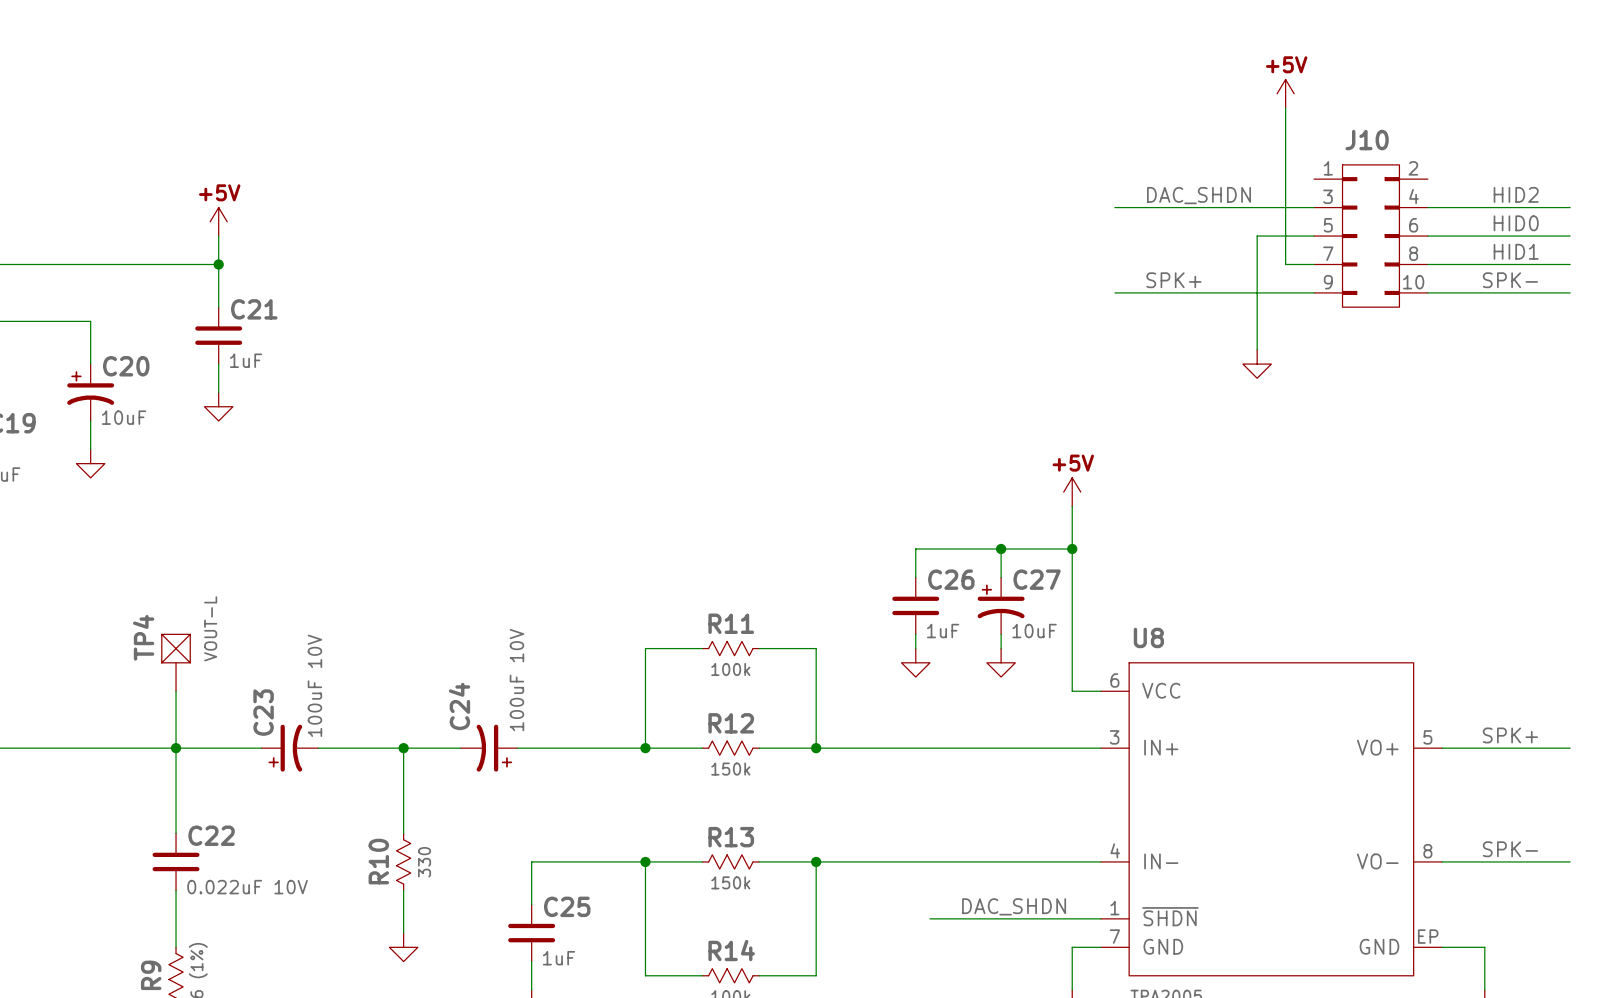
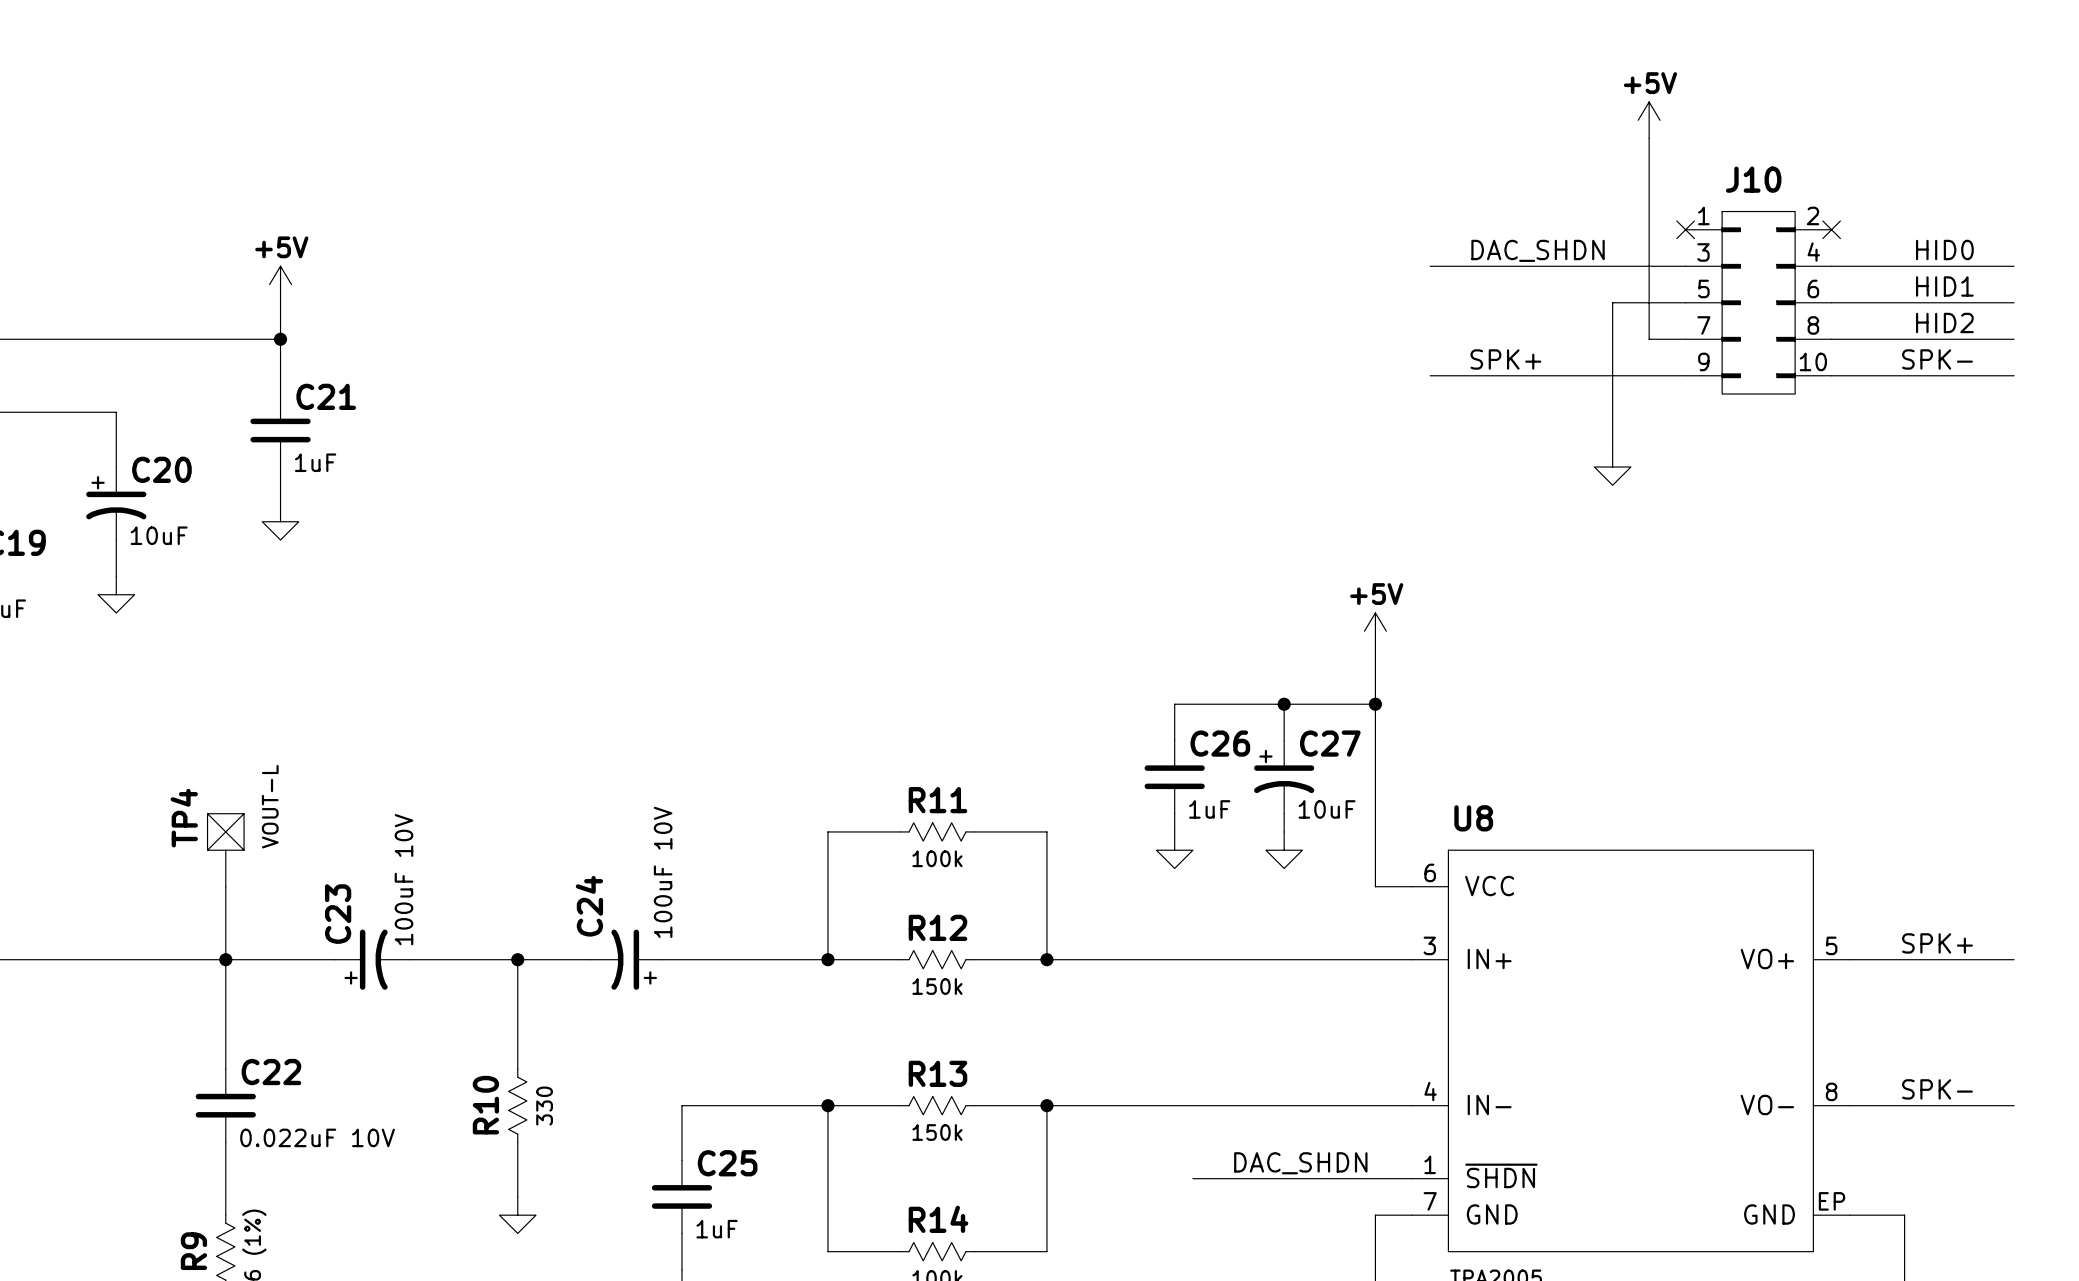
no-connect mark: none -> (1685, 229)
no-connect mark: none -> (1831, 229)
label: HID2 (1516, 194) -> HID0 (1944, 249)
label: HID0 (1516, 223) -> HID1 (1944, 286)
label: HID1 (1516, 251) -> HID2 (1944, 322)

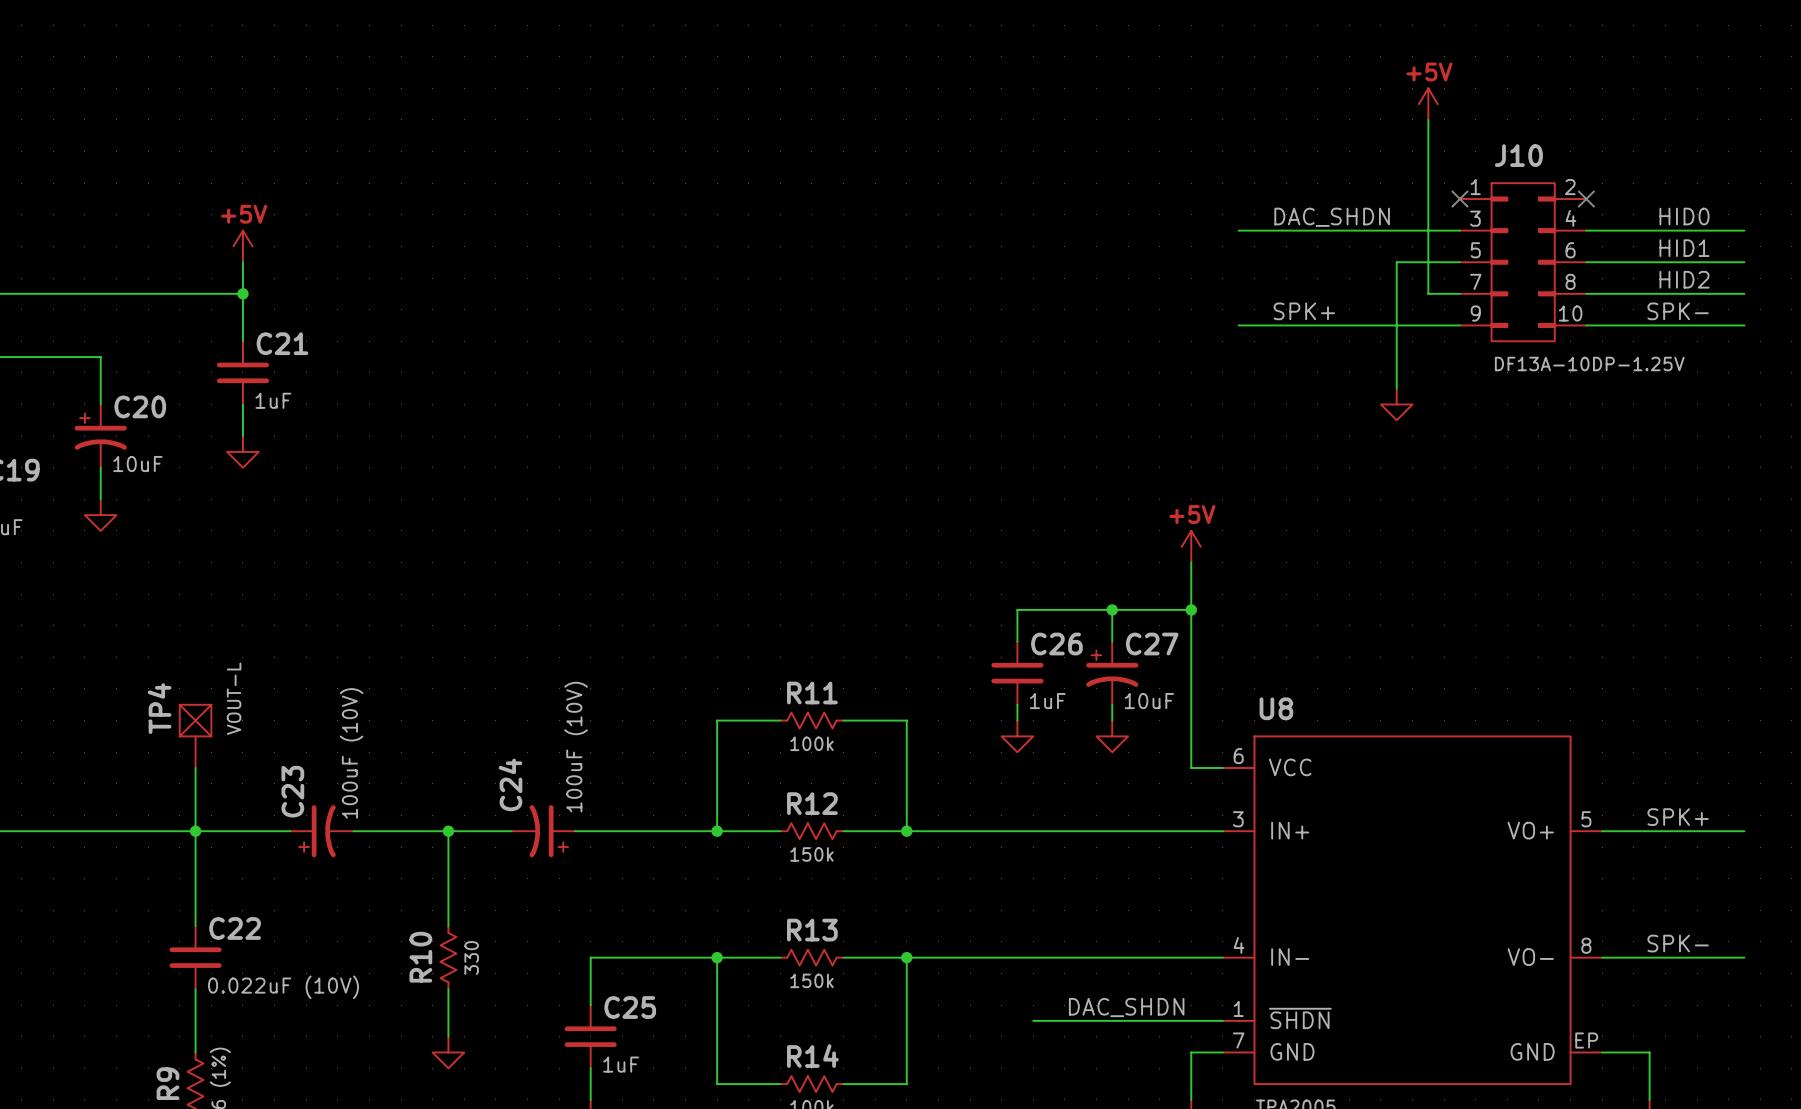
J10 value: none -> DF13A-10DP-1.25V (1589, 363)
C24 value: 100uF 10V (663, 872) -> 100uF (10V) (576, 747)
C23 value: 100uF 10V (404, 879) -> 100uF (10V) (351, 753)
C22 value: 0.022uF 10V (317, 1137) -> 0.022uF (10V) (283, 987)

